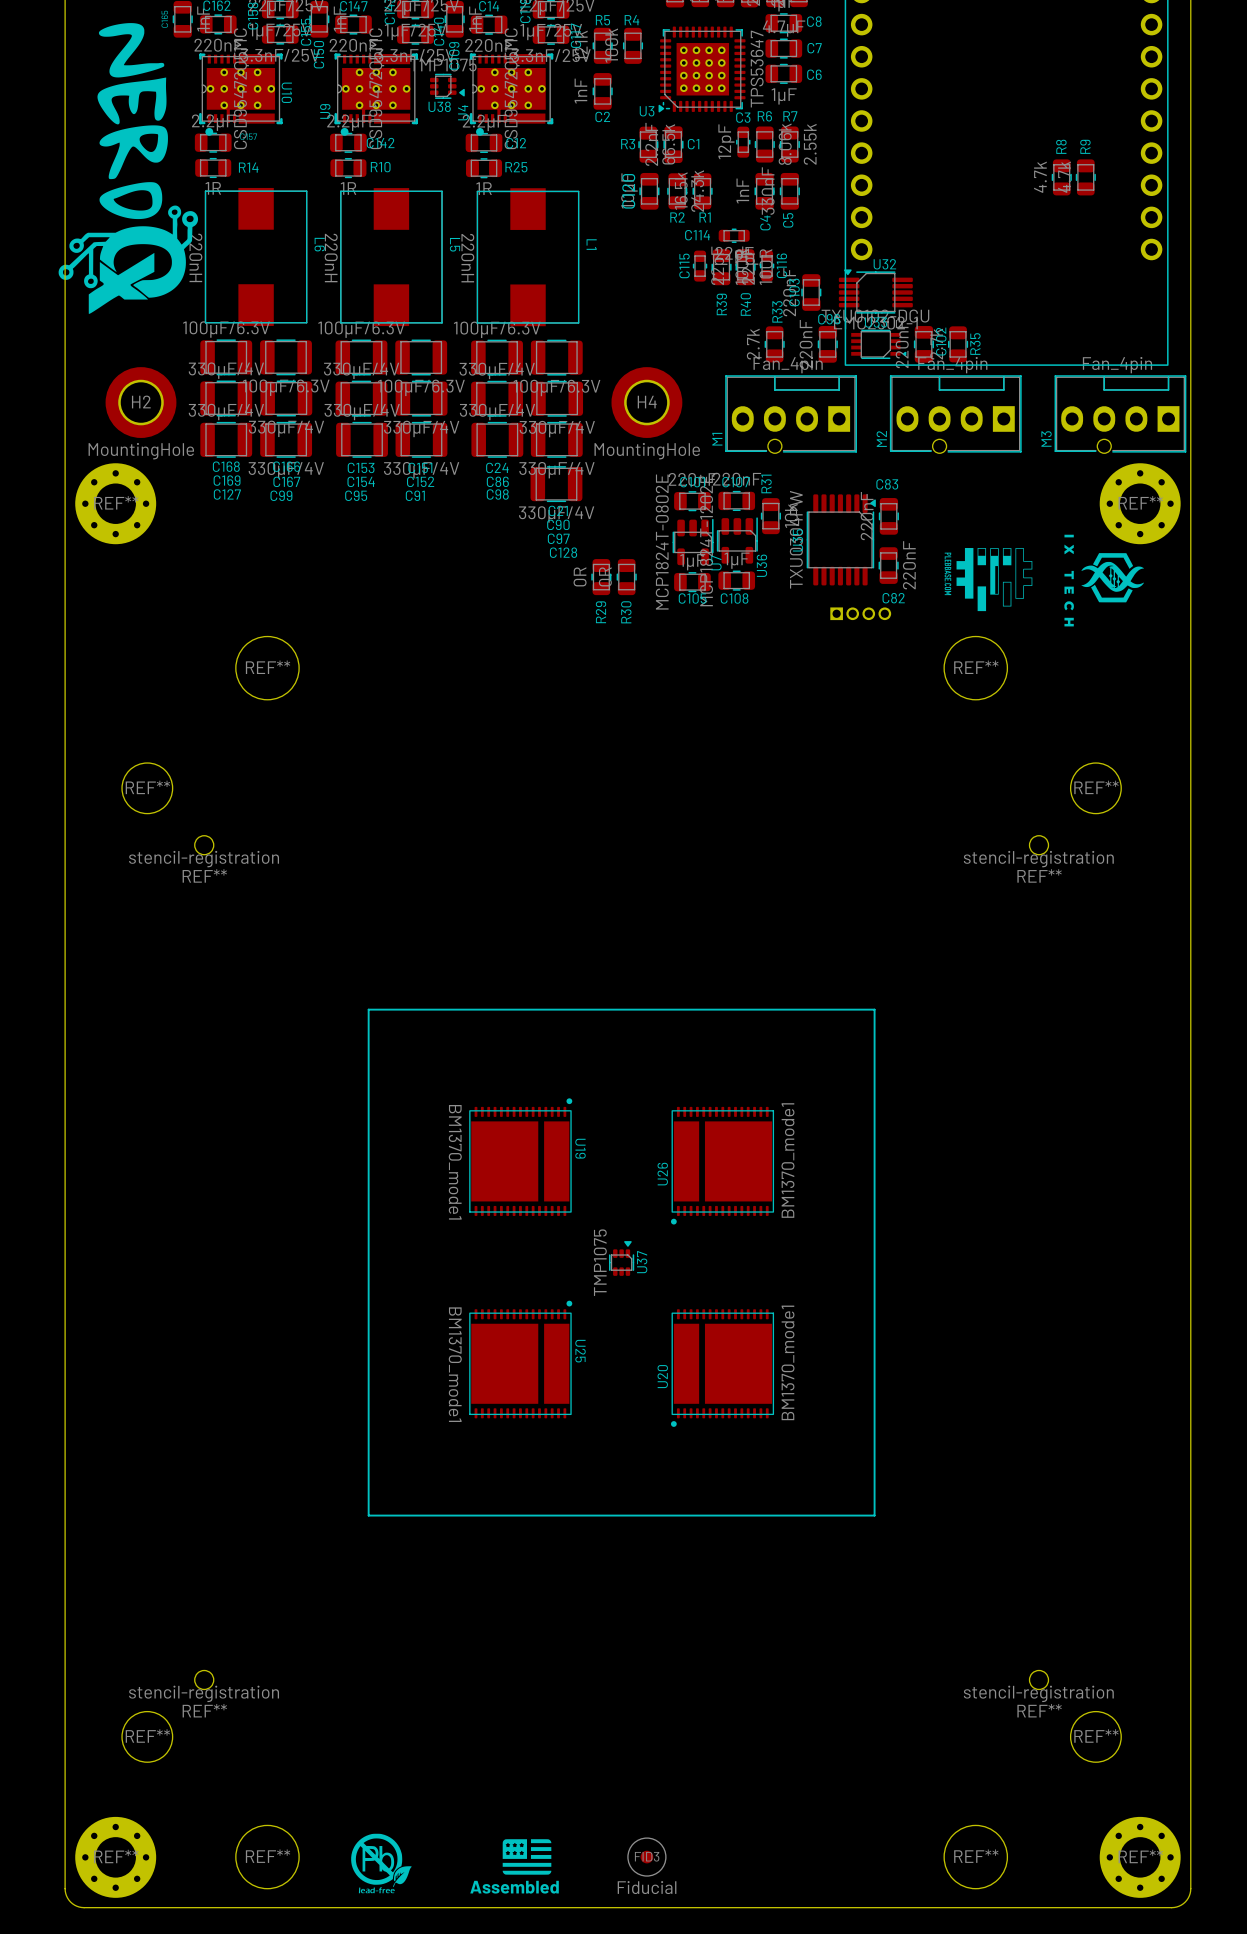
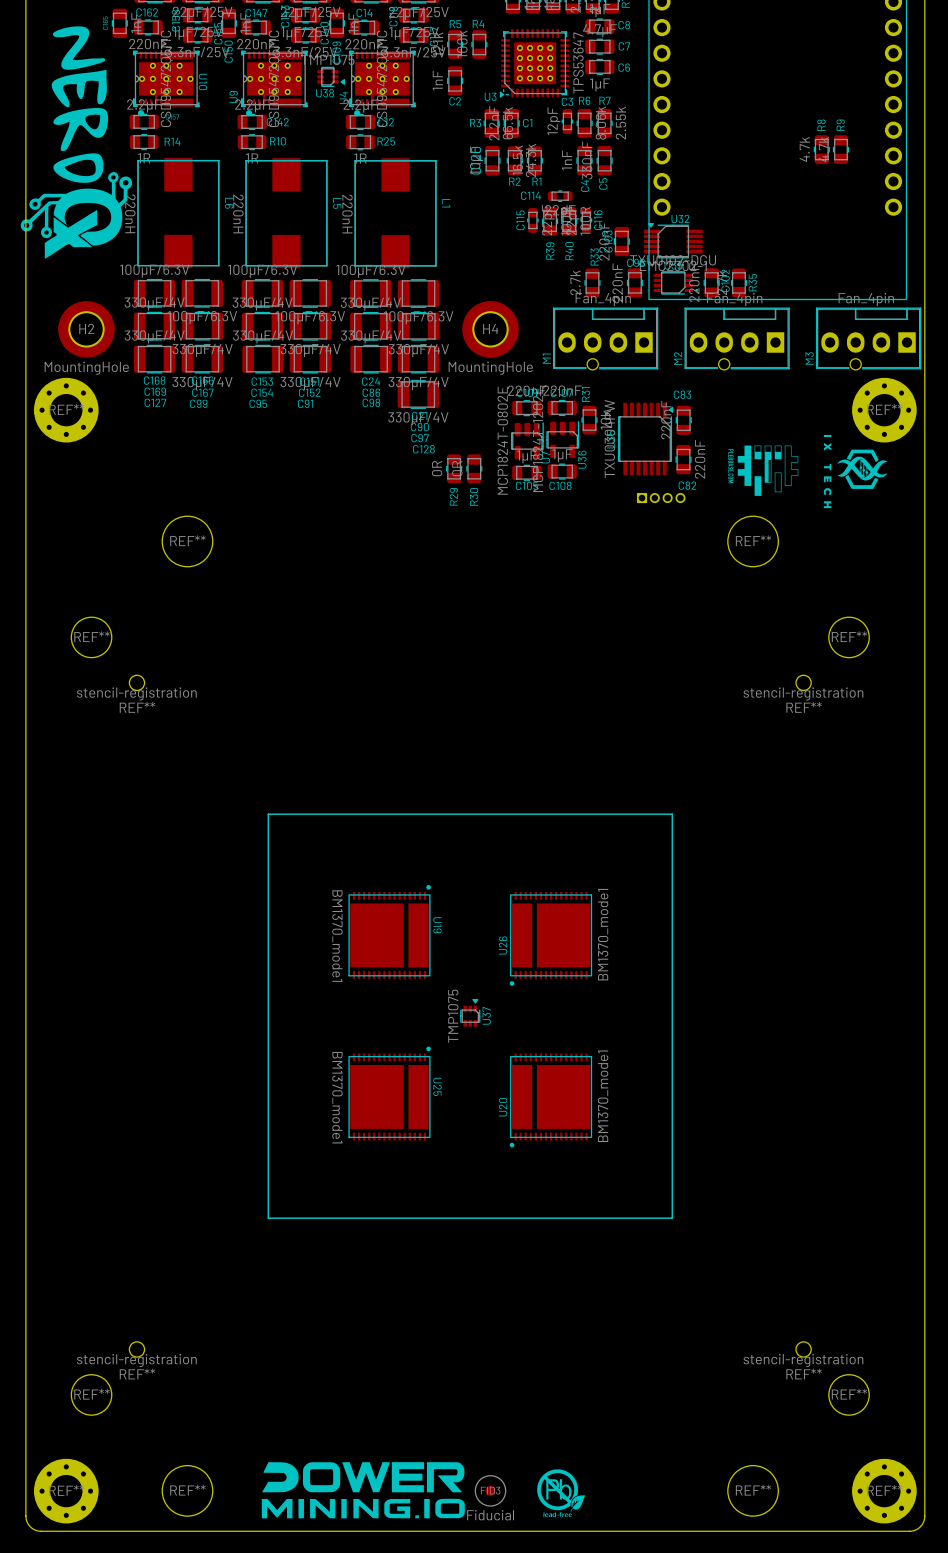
drawing: none -> [261, 1462, 465, 1519]
drawing: none -> [537, 1469, 586, 1517]
drawing: [351, 1833, 412, 1894] -> none
drawing: [502, 1839, 552, 1875] -> none
text: Assembled (514, 1887) -> none

